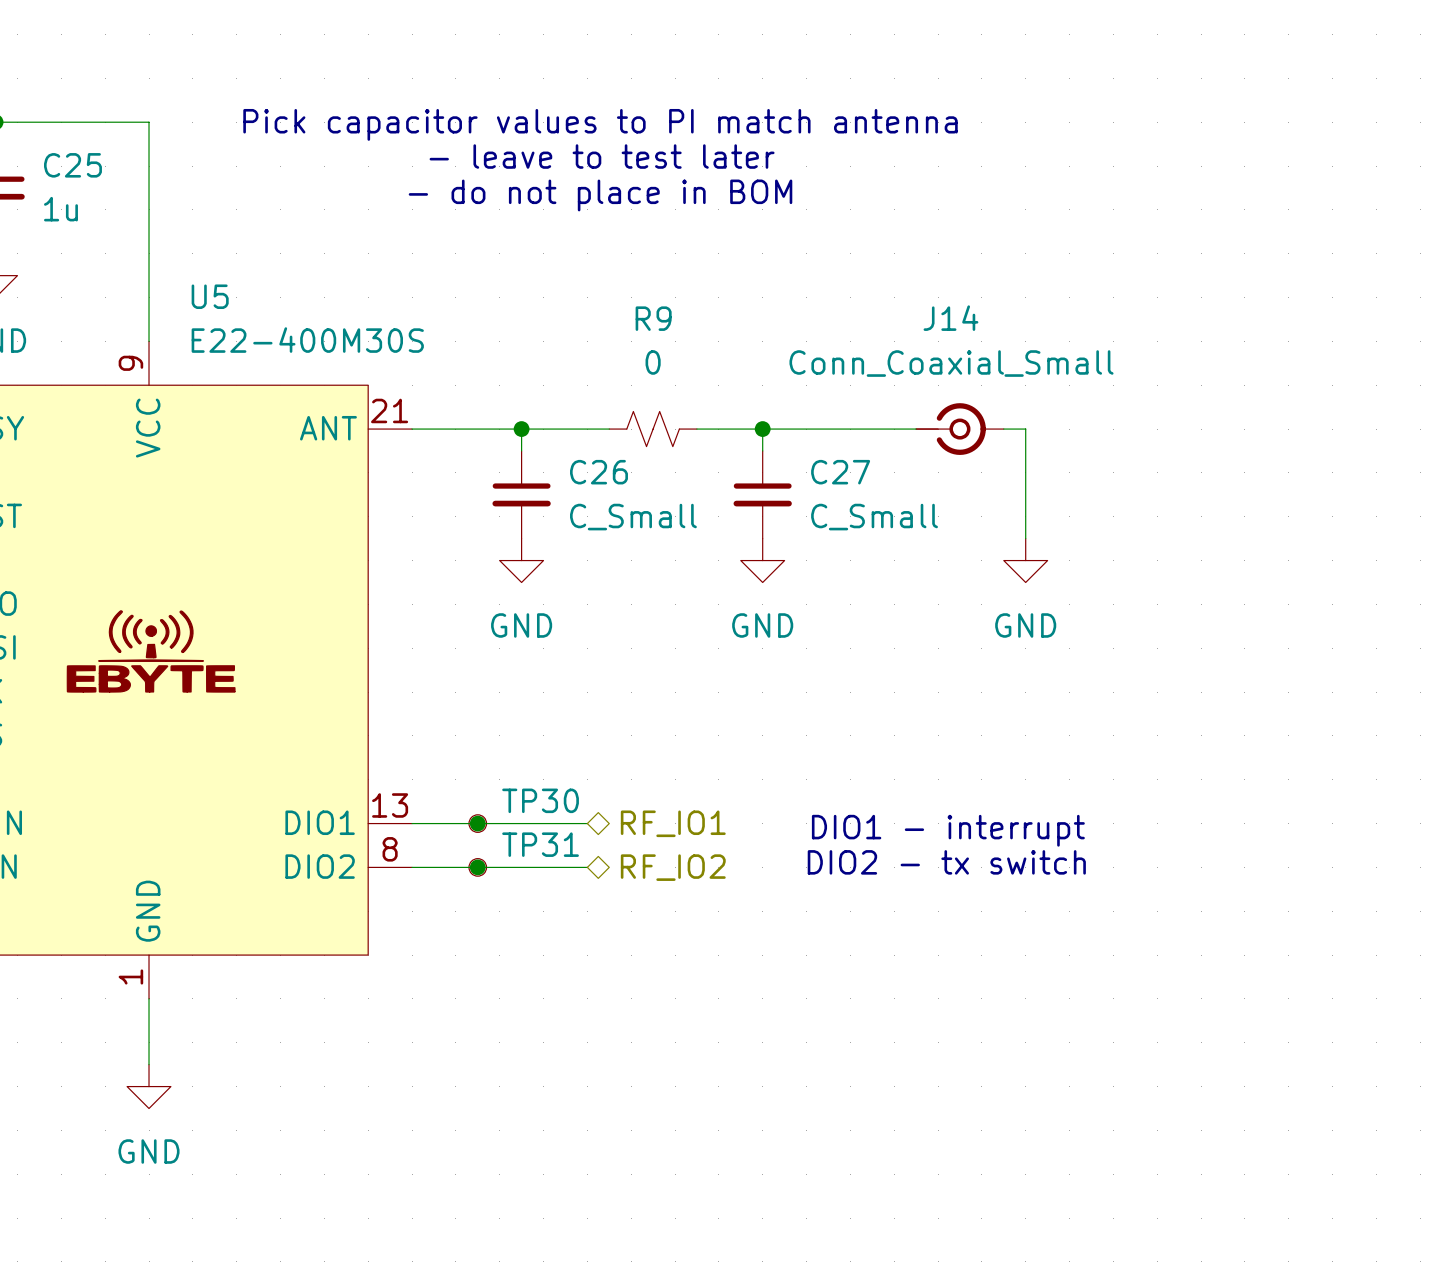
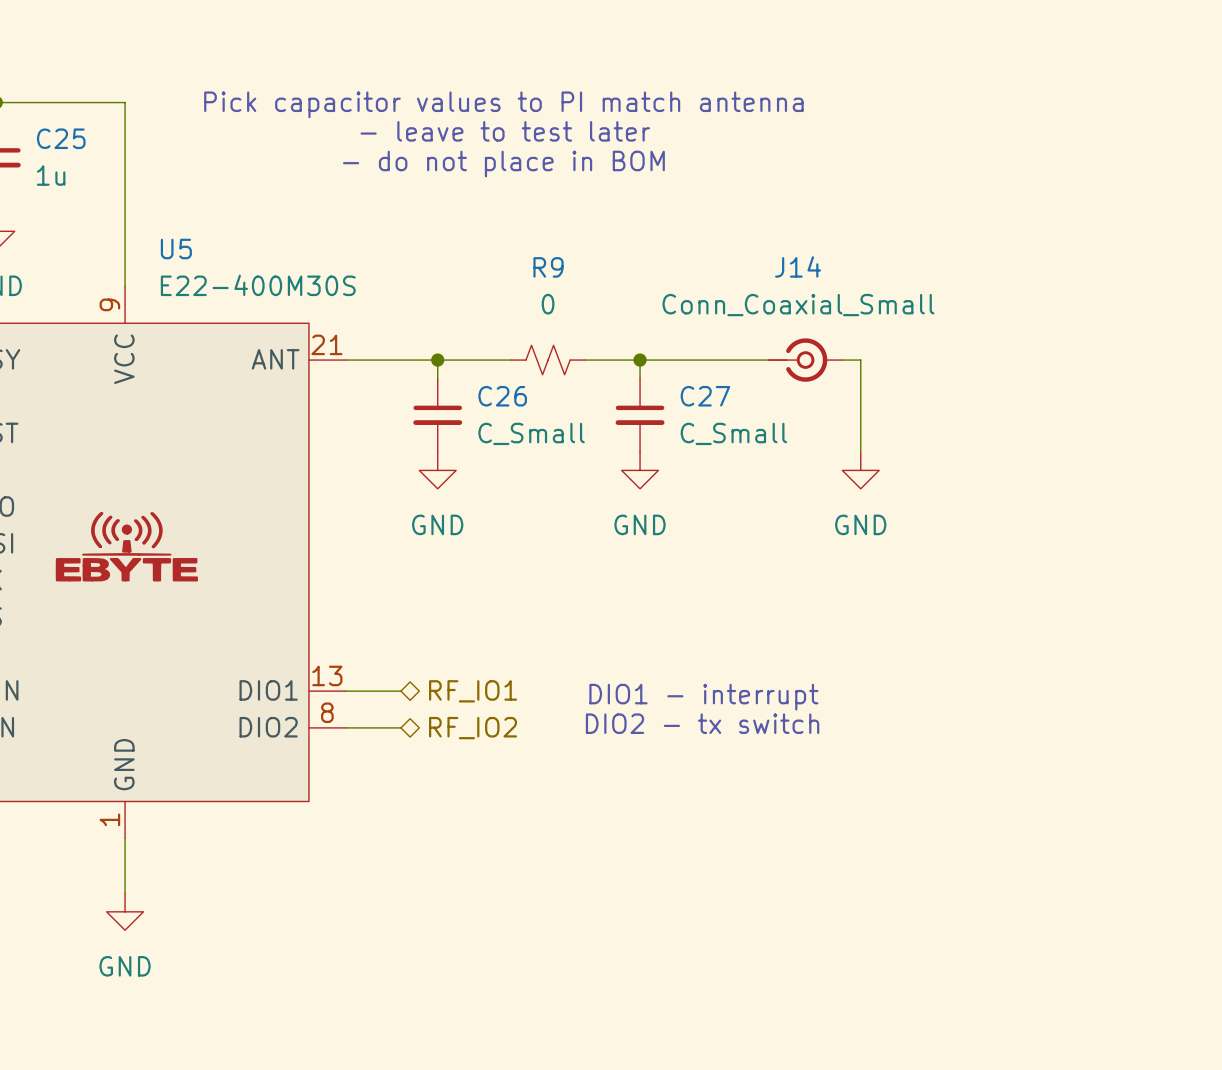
wire: (477, 823) (587, 823) -> none
junction: (477, 823) -> none
TP30: (477, 823) -> none
hierarchical label position: RF_IO1 (673, 823) -> RF_IO1 (473, 691)
text position: DIO1 - interrupt (948, 830) -> DIO1 - interrupt (703, 697)
text position: DIO2 - tx switch (946, 862) -> DIO2 - tx switch (702, 723)
wire: (477, 867) (587, 867) -> none
junction: (477, 867) -> none
TP31: (477, 867) -> none
hierarchical label position: RF_IO2 (673, 867) -> RF_IO2 (473, 728)

